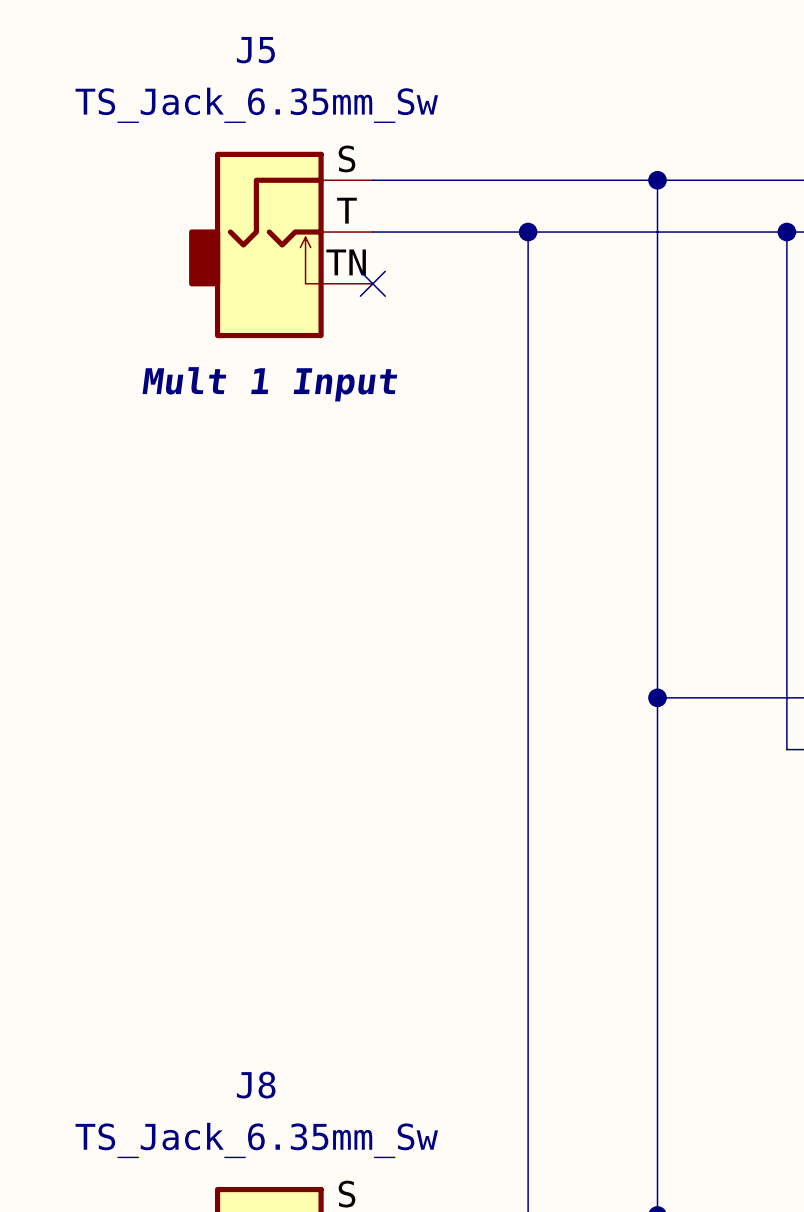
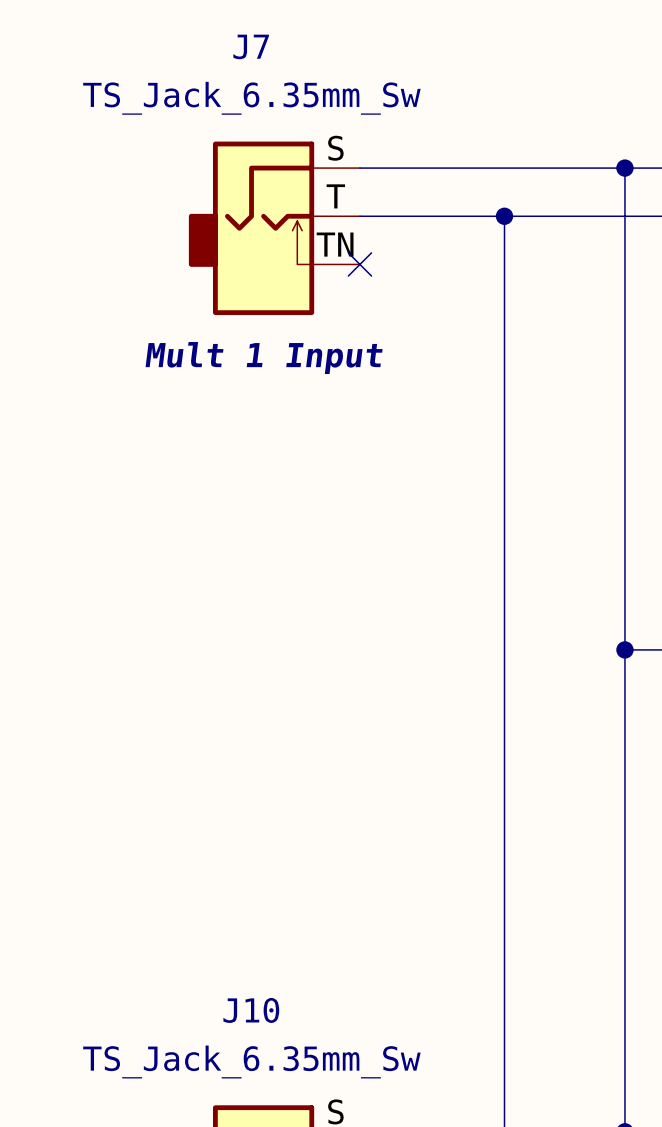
J5 name: J5 (255, 50) -> J7 (251, 46)
J8 name: J8 (256, 1085) -> J10 (251, 1010)

